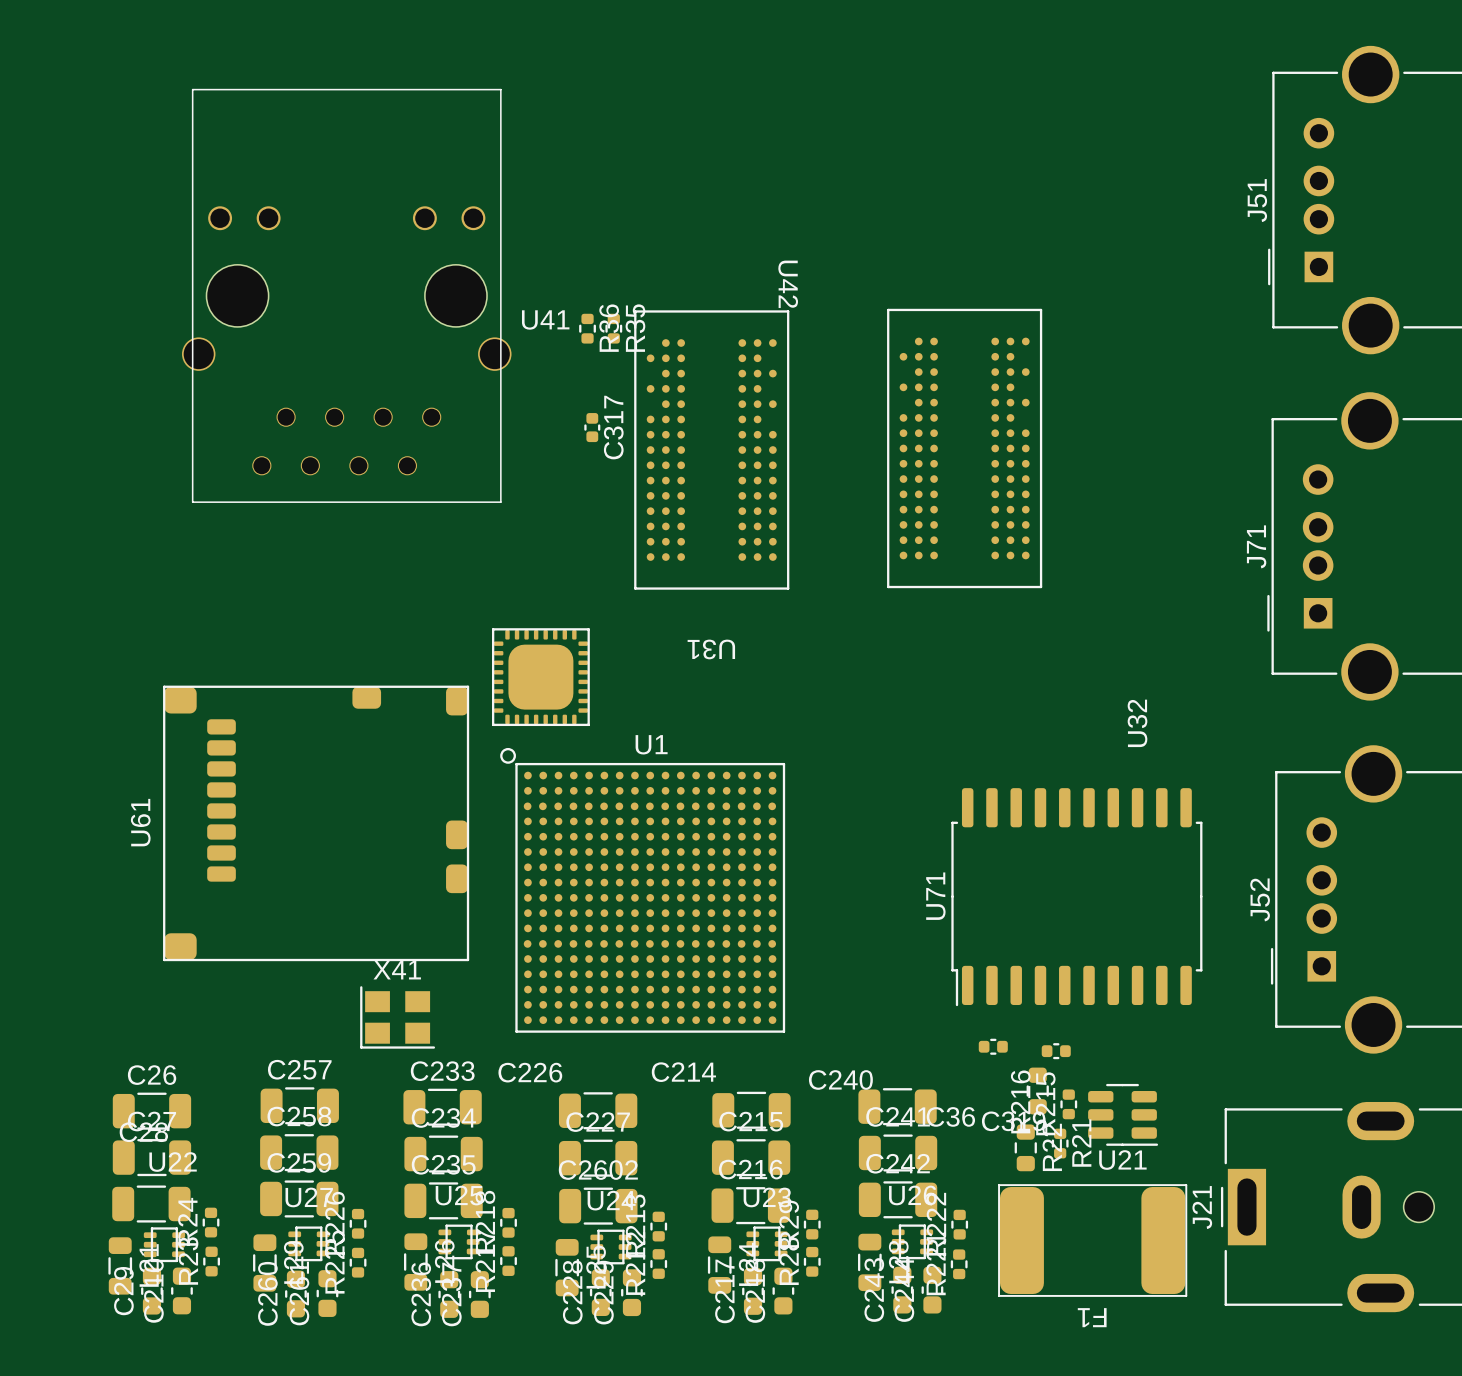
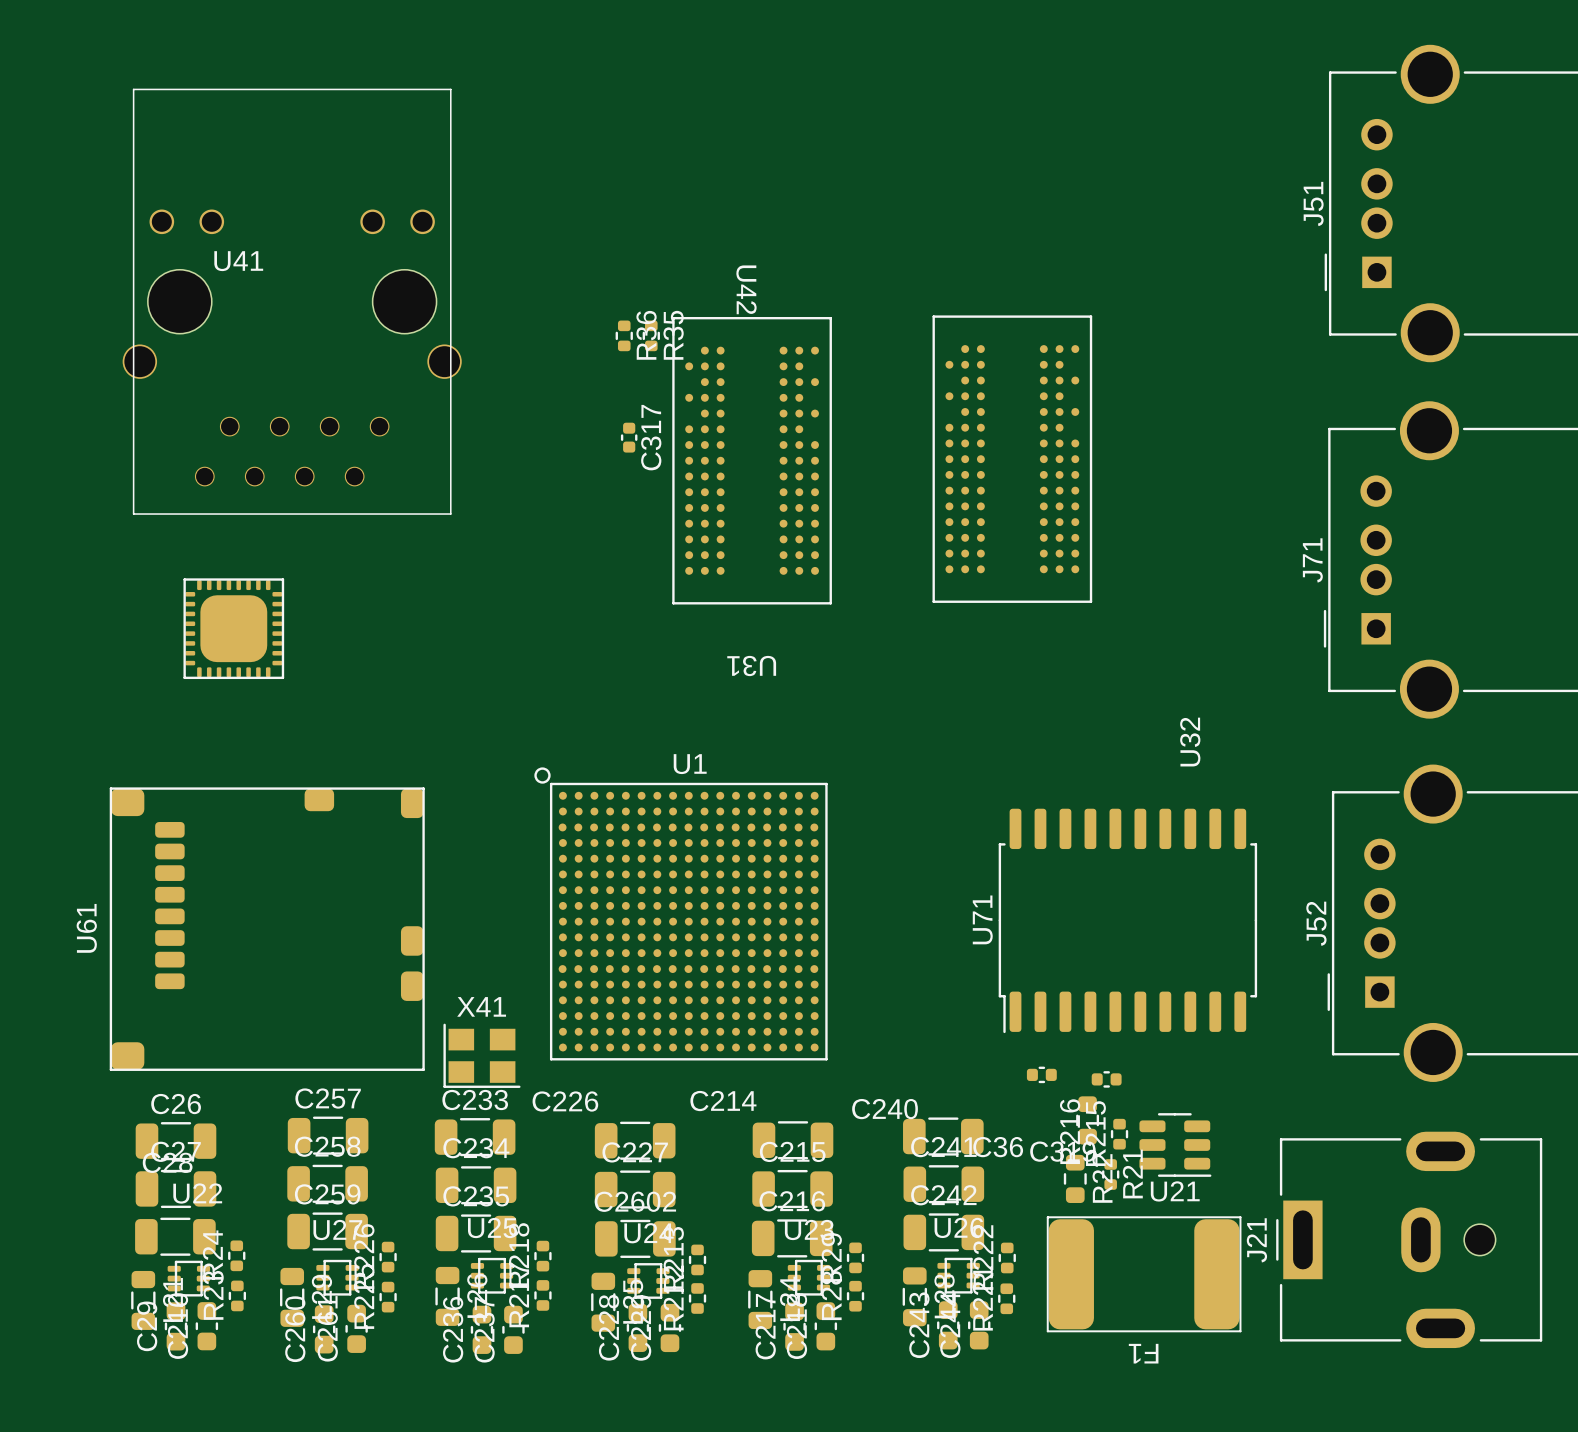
U42 position: (346, 295) -> (292, 301)
U41 position: (540, 677) -> (233, 628)
U61 position: (316, 823) -> (267, 929)
X41 position: (397, 1017) -> (481, 1055)

